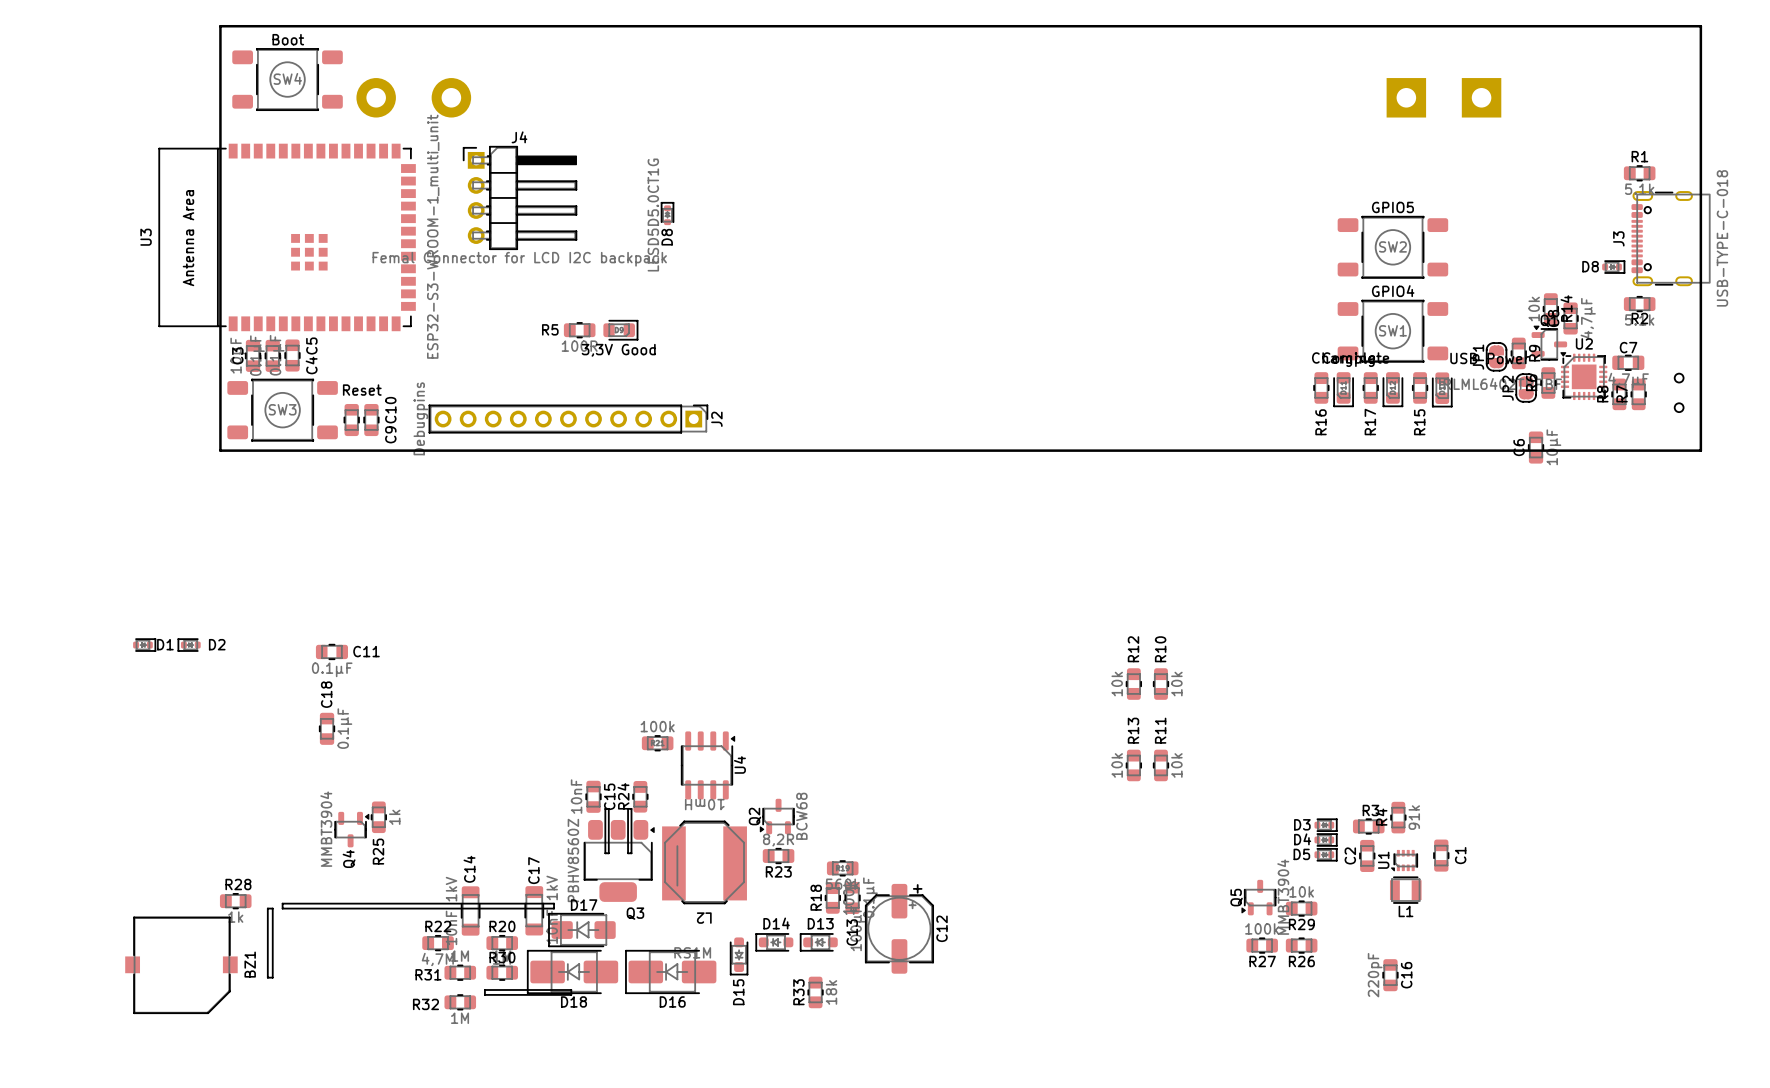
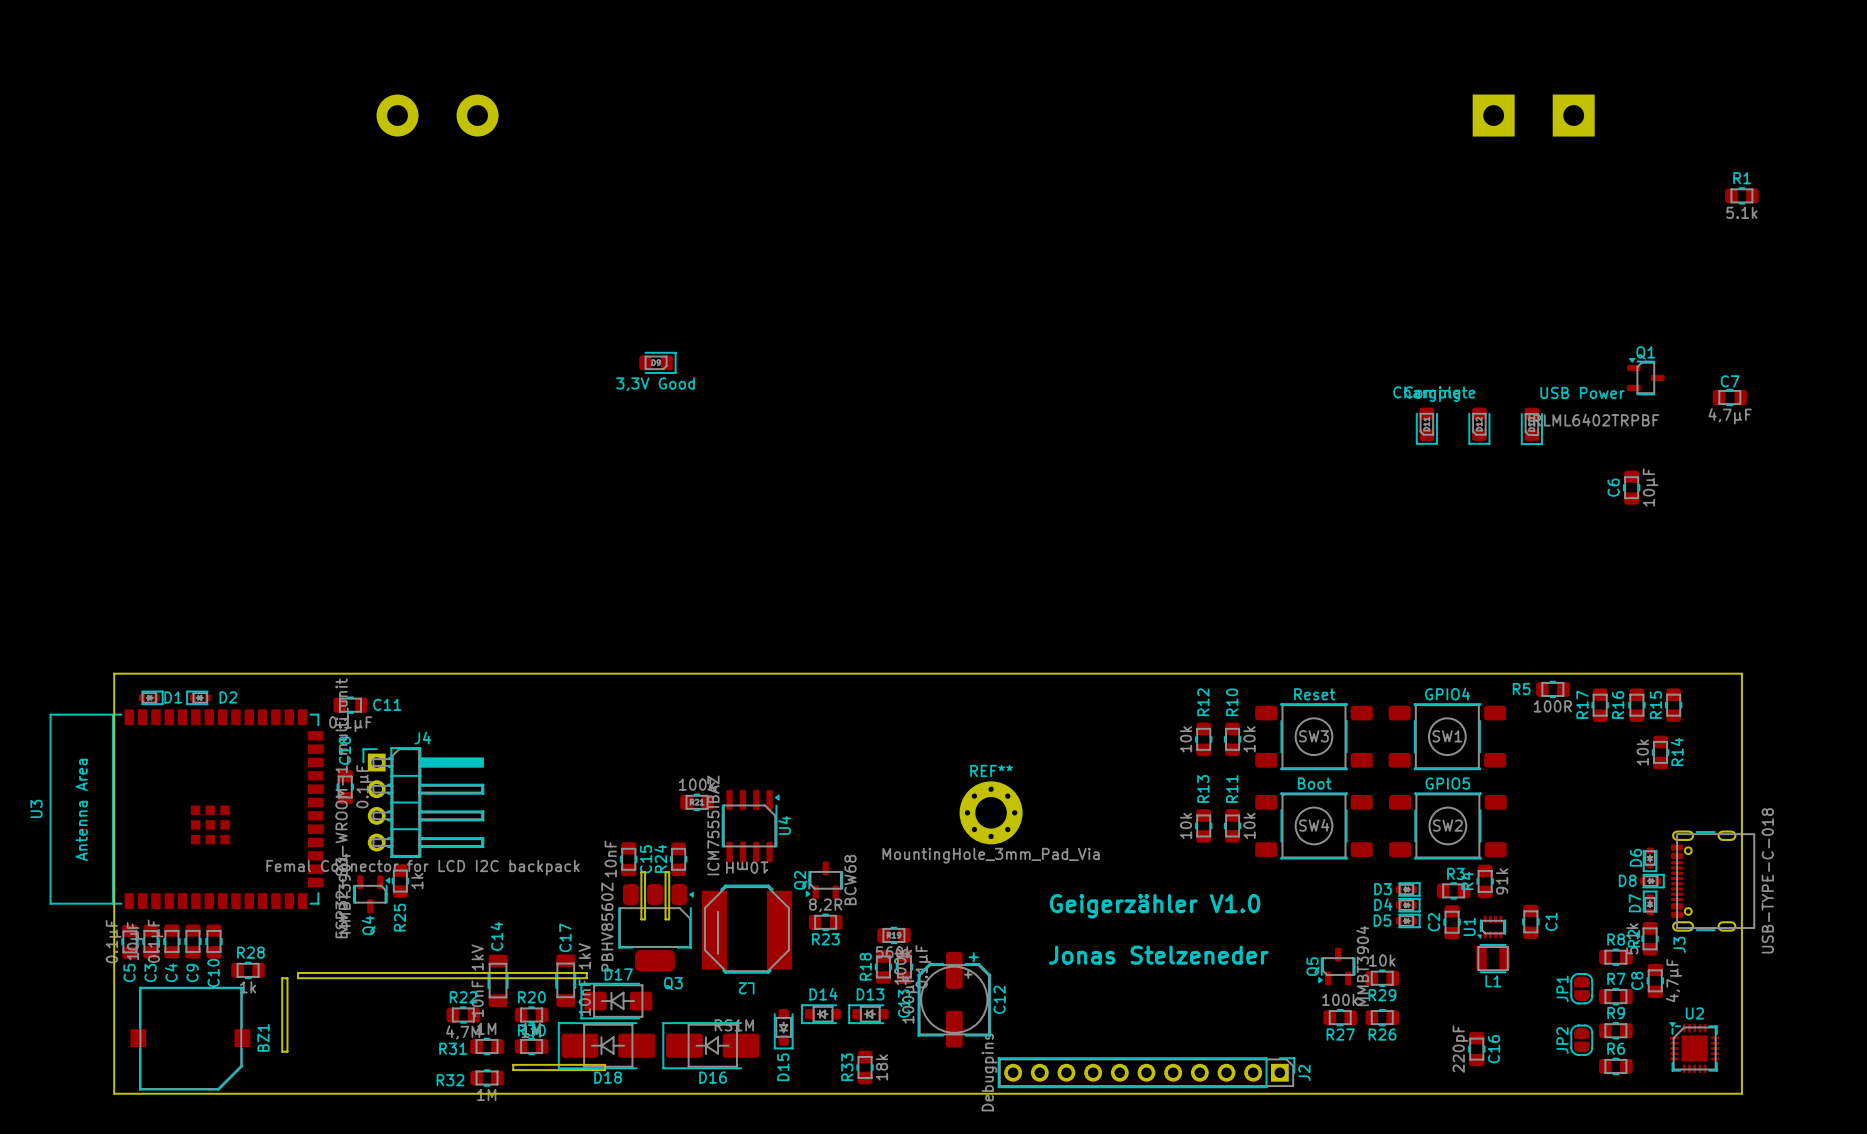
board edge: (220, 26) (1700, 26) (1700, 450) (220, 450) (220, 26) -> none
SW4 position: (287, 79) -> (1313, 825)
J4 position: (520, 197) -> (423, 802)
D8: LESD5D5.0CT1G (667, 213) -> none
U3 position: (287, 237) -> (186, 809)
J3 name position: J3 (1618, 238) -> J3 (1679, 944)
J3 position: (1670, 238) -> (1712, 881)
SW2 position: (1392, 247) -> (1447, 825)
D8: (1613, 267) -> none
R2 rotation: 0° (1639, 304) -> 90° clockwise (1650, 938)
R2 position: (1639, 304) -> (1650, 938)
R14 position: (1550, 309) -> (1660, 752)
C8 position: (1570, 318) -> (1655, 980)
R5 position: (579, 330) -> (1552, 689)
SW1 position: (1392, 331) -> (1447, 736)
C5 name position: C5 (311, 346) -> C5 (129, 972)
R9 rotation: 0° (1518, 353) -> 90° clockwise (1615, 1030)
R9 position: (1518, 353) -> (1615, 1030)
R9 name position: R9 (1534, 353) -> R9 (1616, 1013)
C3 name position: C3 (237, 355) -> C3 (150, 972)
C3 position: (253, 355) -> (150, 941)
C4 position: (272, 355) -> (171, 941)
C5 position: (292, 355) -> (129, 941)
JP1 position: (1496, 356) -> (1581, 988)
C4 name position: C4 (311, 365) -> C4 (171, 972)
U2 position: (1583, 376) -> (1694, 1047)
R6 rotation: 0° (1548, 383) -> 90° clockwise (1615, 1066)
R6 position: (1548, 383) -> (1615, 1066)
R16 position: (1321, 387) -> (1636, 705)
R17 position: (1370, 387) -> (1600, 705)
R15 position: (1420, 387) -> (1673, 705)
JP2 position: (1526, 387) -> (1581, 1040)
SW3 value position: Reset (362, 390) -> Reset (1314, 694)
part: (1679, 392) -> none
R8 rotation: 0° (1619, 394) -> 90° clockwise (1615, 957)
R8 position: (1619, 394) -> (1615, 957)
R7 rotation: 0° (1638, 394) -> 90° clockwise (1615, 996)
R7 position: (1638, 394) -> (1615, 996)
SW3 position: (282, 410) -> (1313, 736)
C10 name position: C10 (390, 410) -> C10 (213, 972)
J2 position: (568, 419) -> (1146, 1072)
C9 position: (351, 420) -> (192, 941)
C10 position: (371, 420) -> (213, 941)
R16 name position: R16 (1321, 422) -> R16 (1618, 704)
R17 name position: R17 (1370, 422) -> R17 (1582, 704)
R15 name position: R15 (1419, 422) -> R15 (1655, 704)
C9 name position: C9 (390, 434) -> C9 (192, 972)
board edge: none -> (114, 673) (1741, 673) (1741, 1093) (114, 1093) (114, 673)
REF**: none -> MountingHole_3mm_Pad_Via (991, 812)
U4 value: none -> ICM7555IBAZ (713, 825)
D6: none -> (1650, 859)
D8: none -> (1652, 881)
D7: none -> (1650, 903)
text: none -> Geigerzähler V1.0 (1155, 906)
text: none -> Jonas Stelzeneder (1158, 955)

